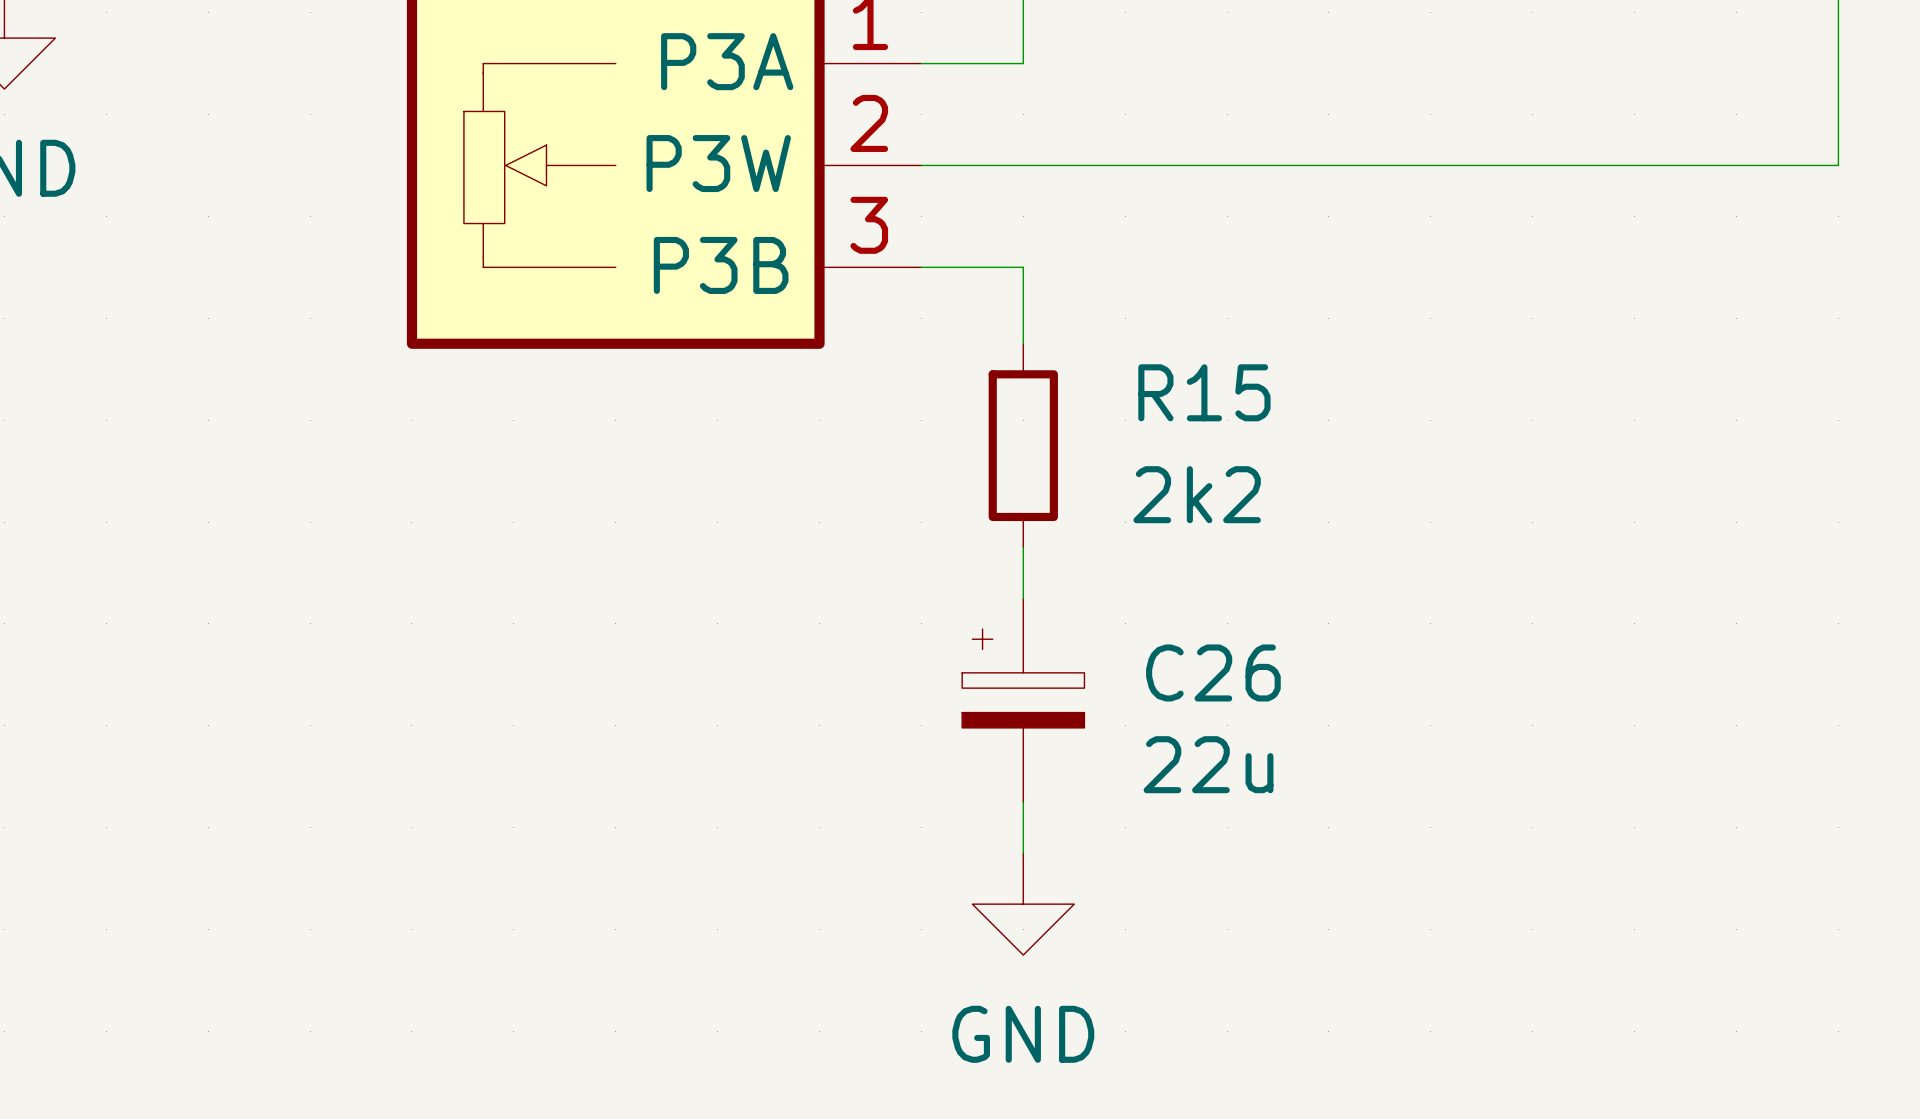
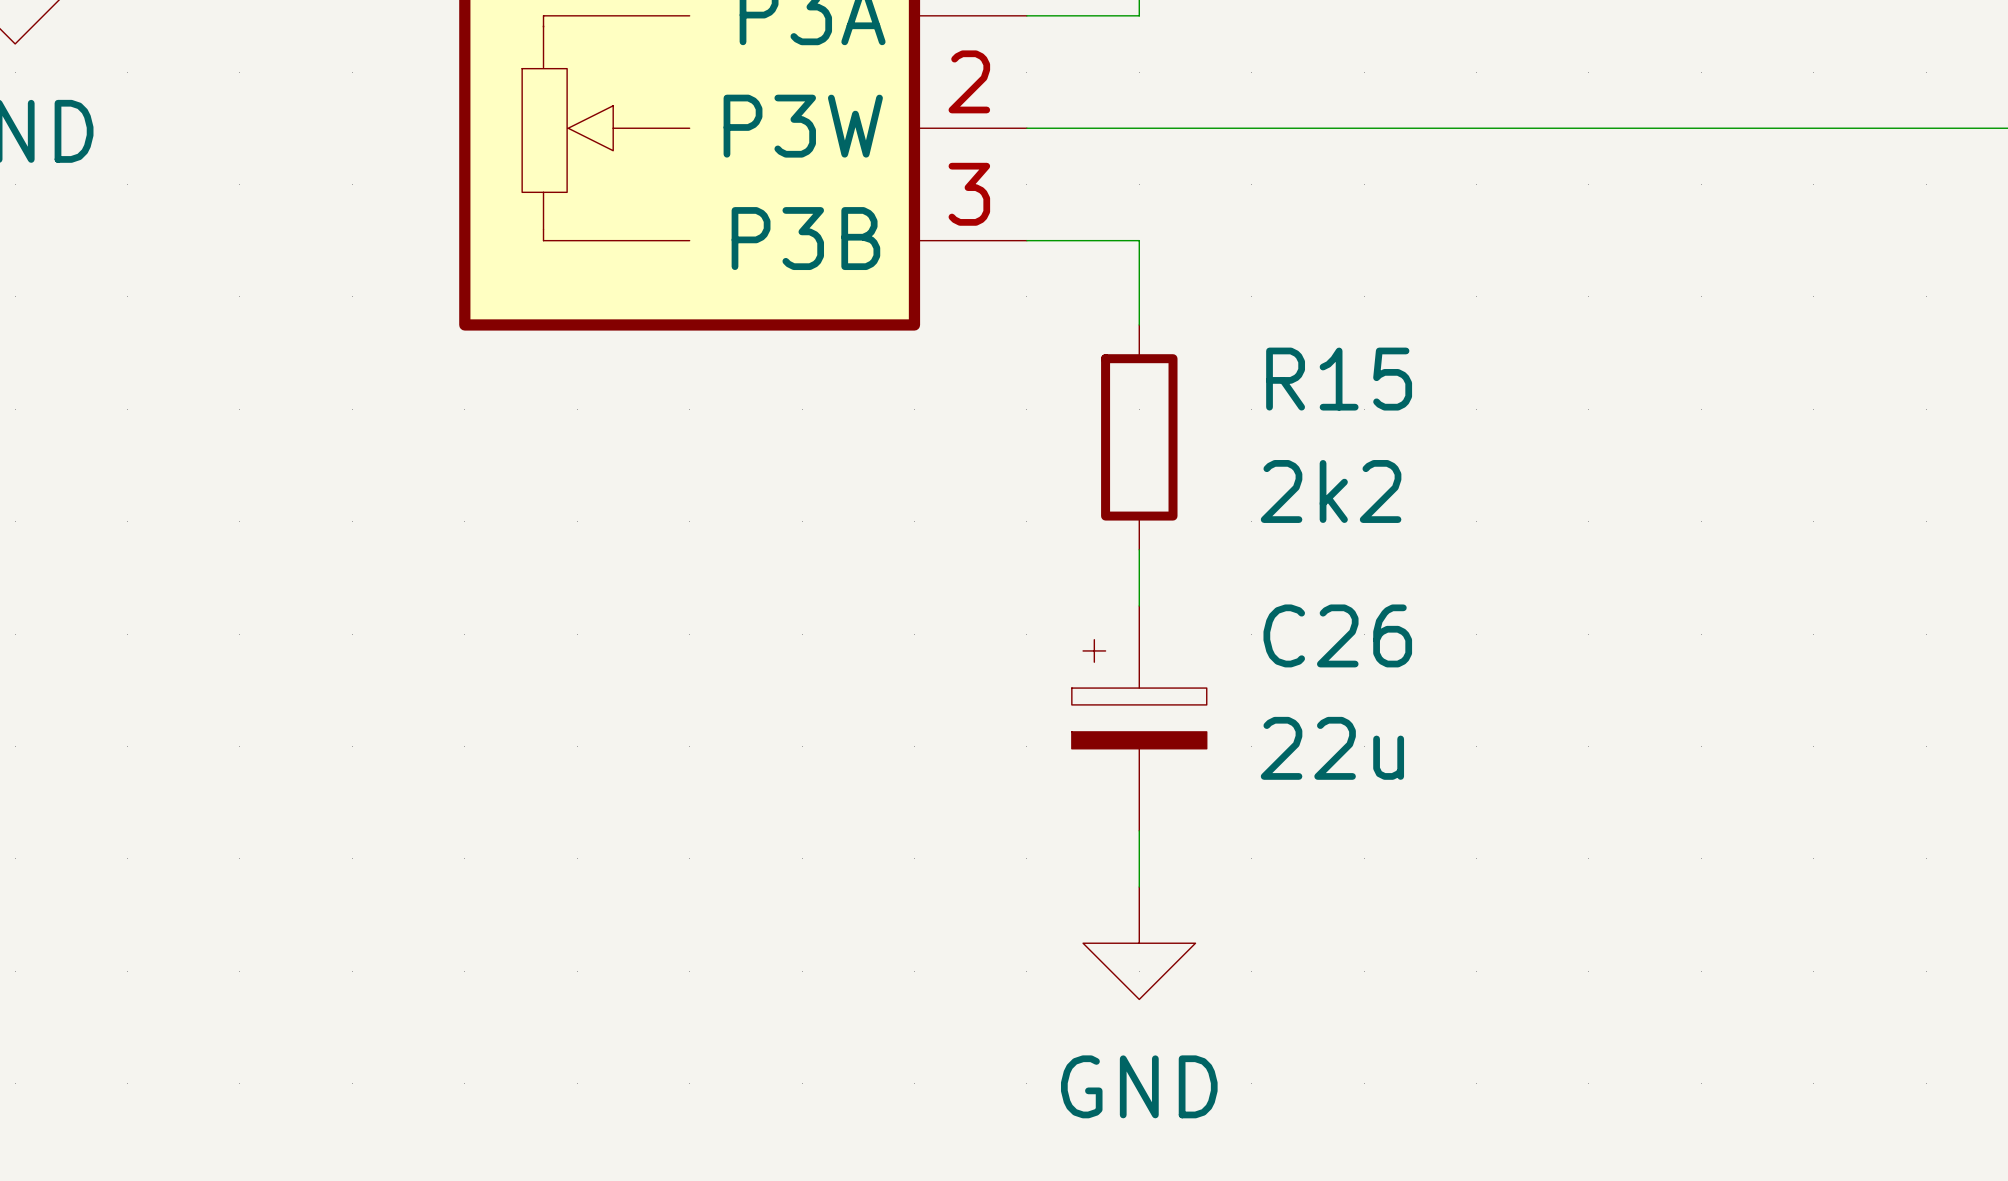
C26 name position: C26 (1213, 672) -> C26 (1337, 635)
C26 value position: 22u (1208, 764) -> 22u (1332, 748)

